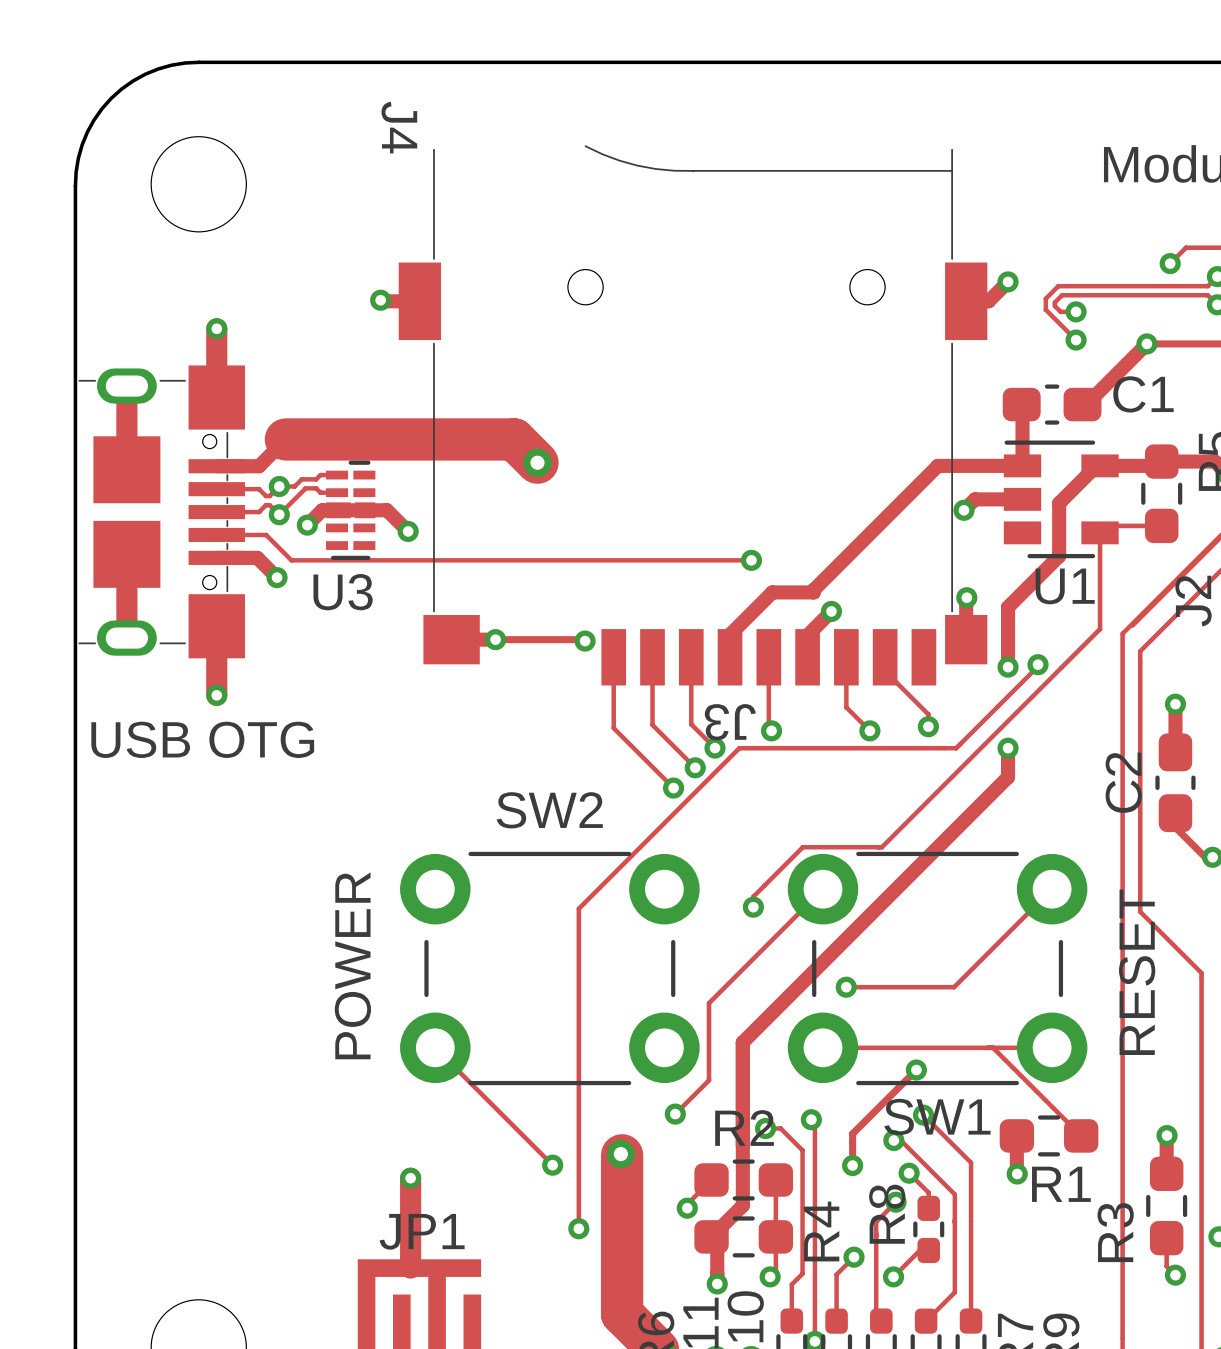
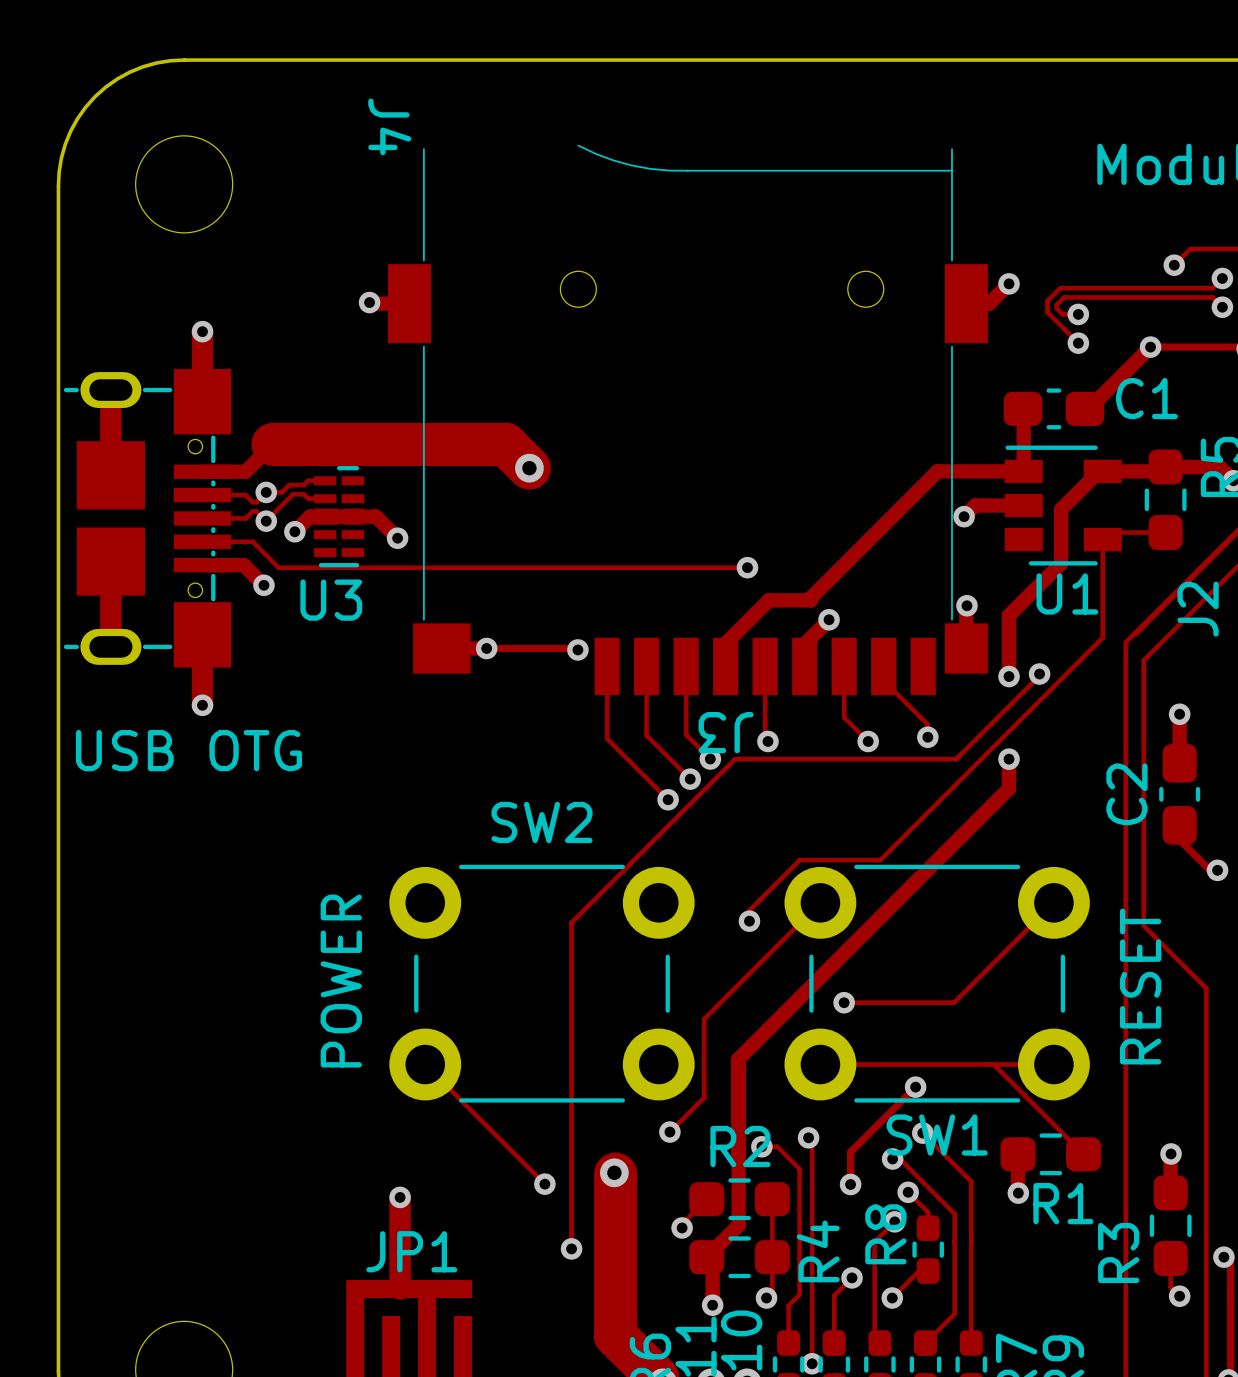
J4 footprint: [78, 365, 245, 659] -> [63, 369, 232, 668]

